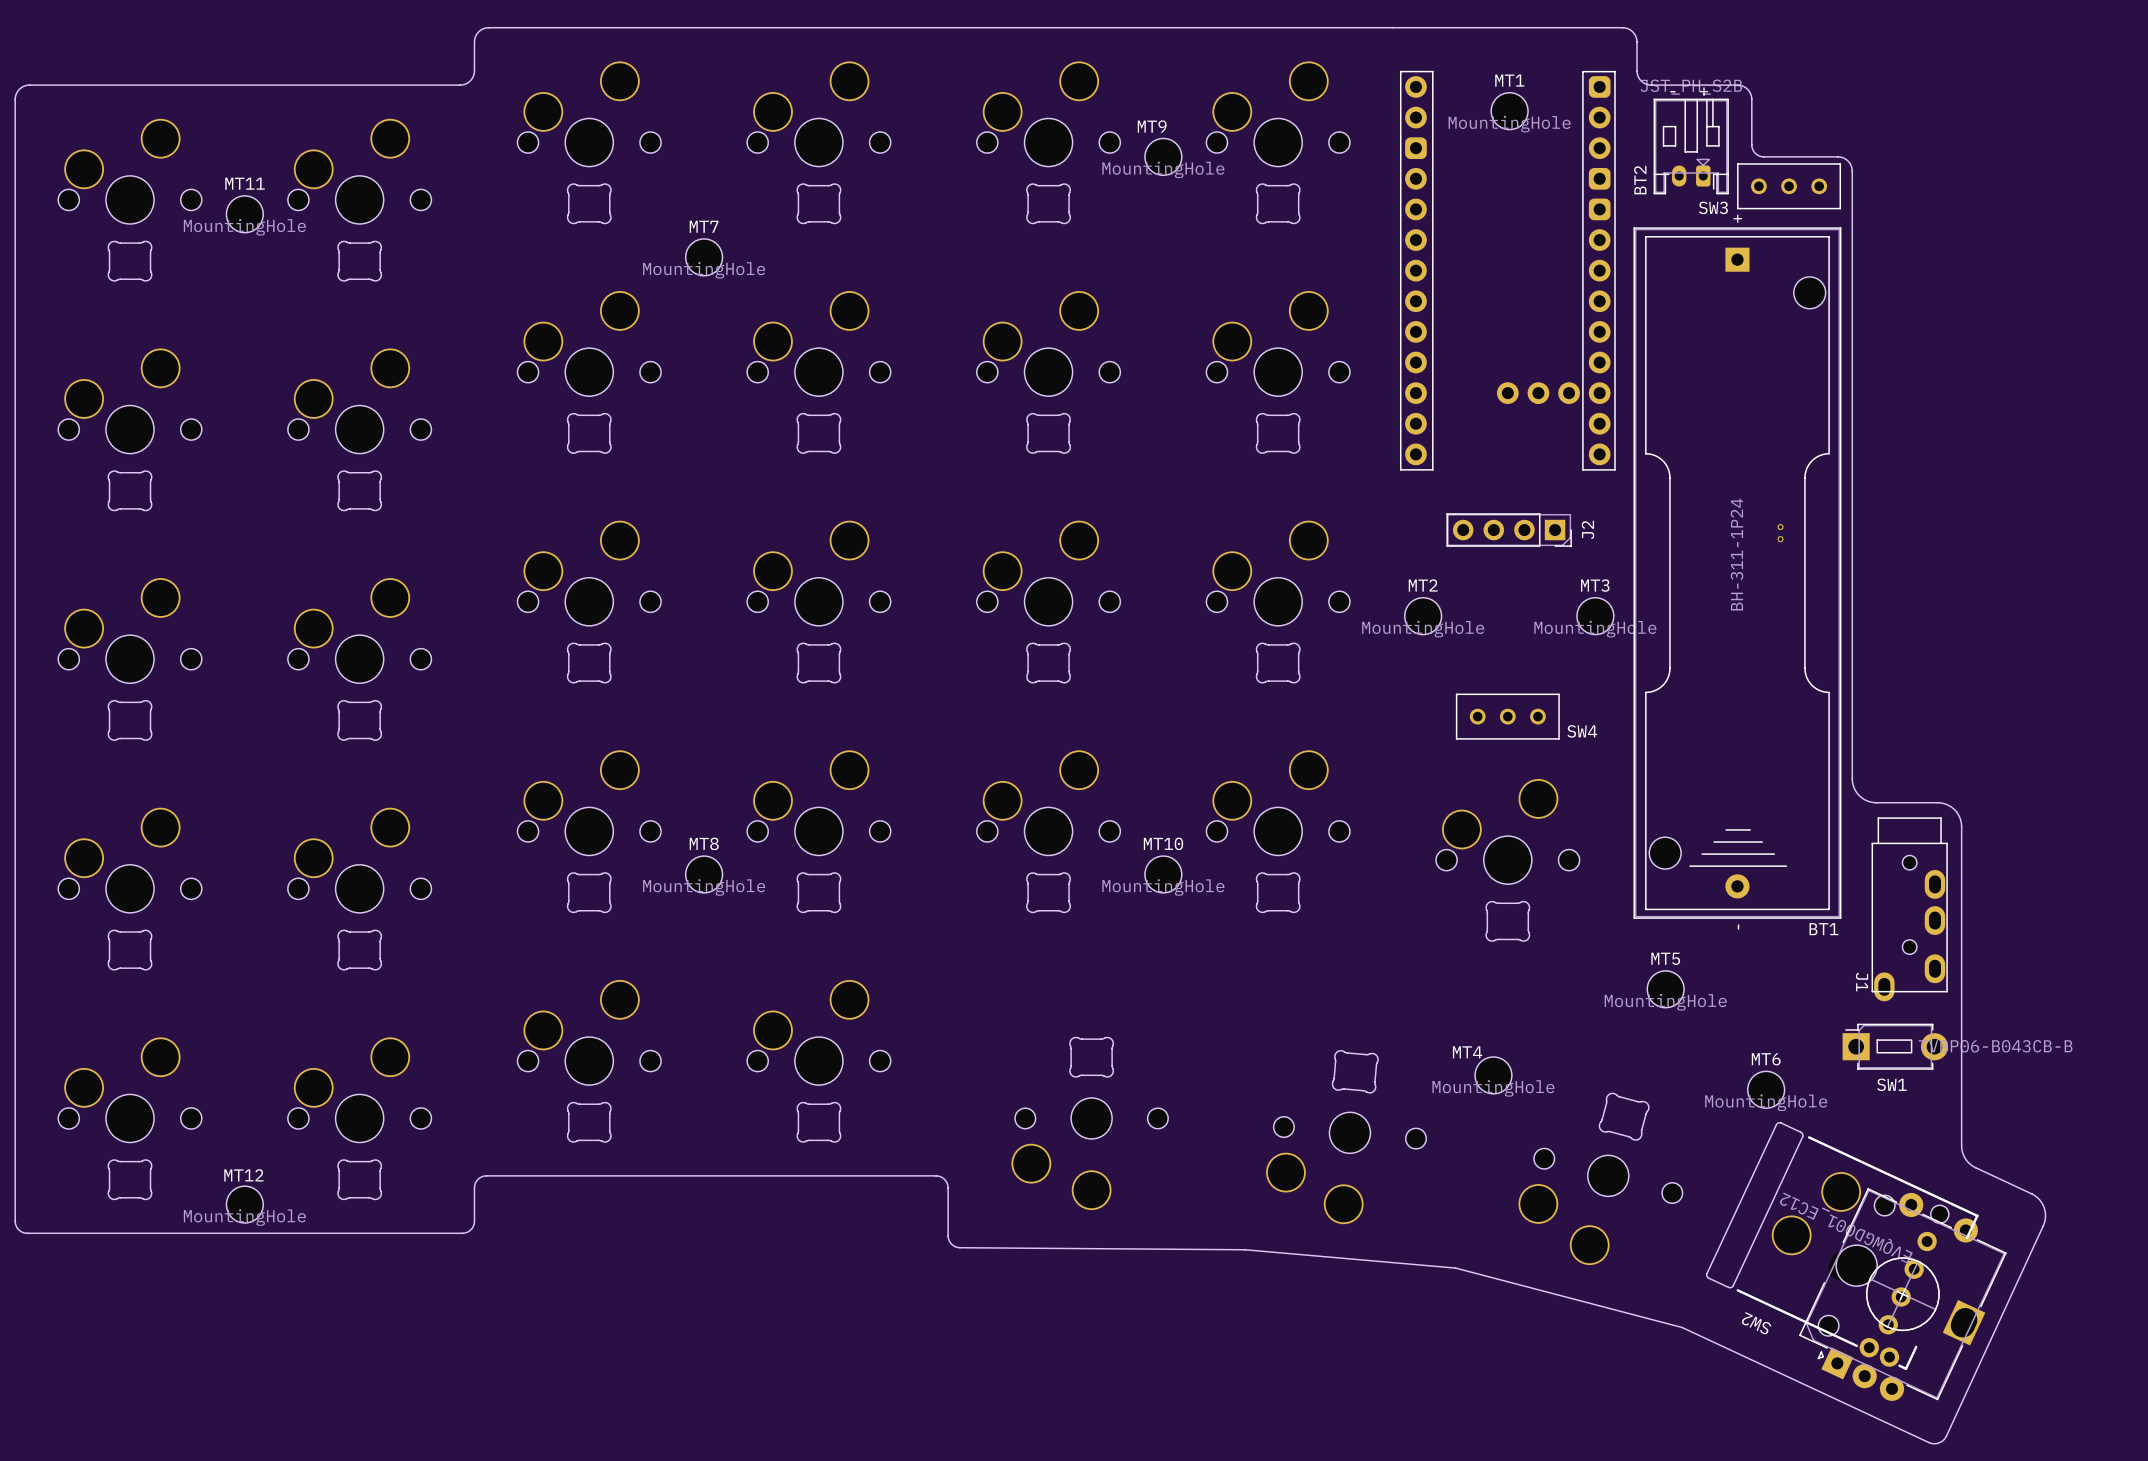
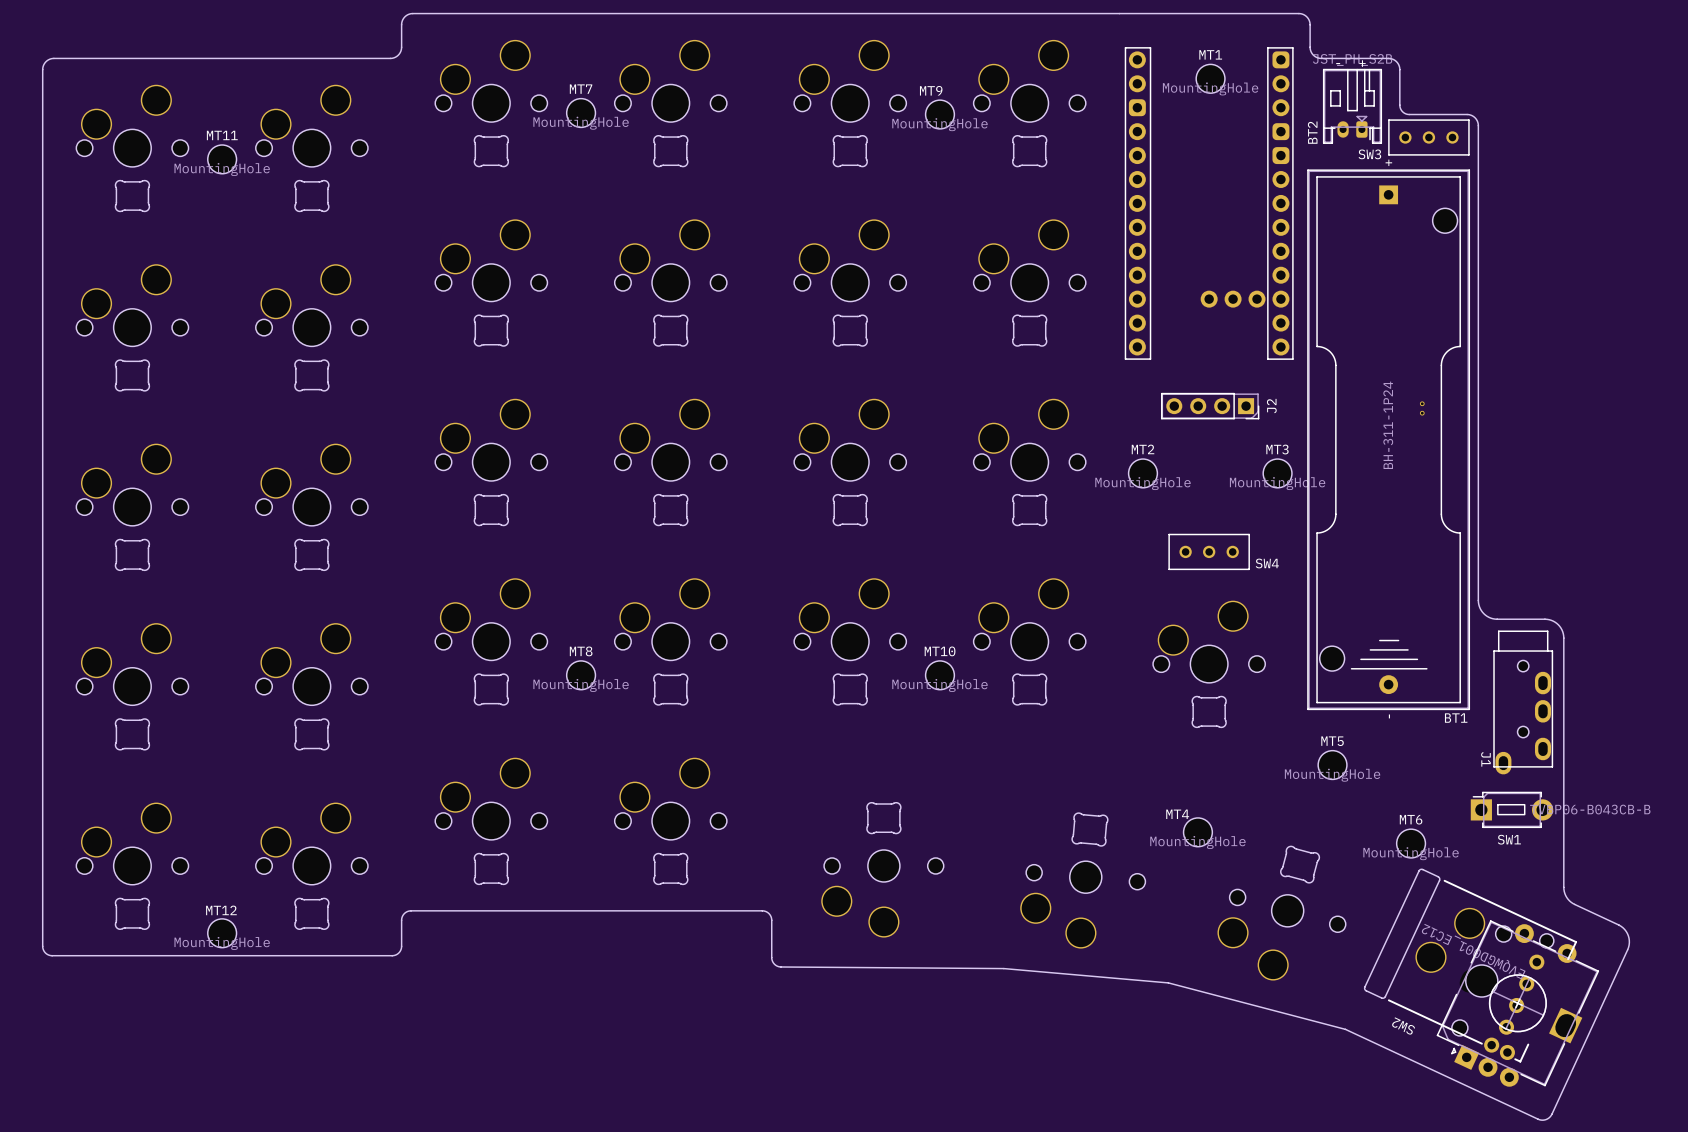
MT7 position: (704, 257) -> (581, 113)

